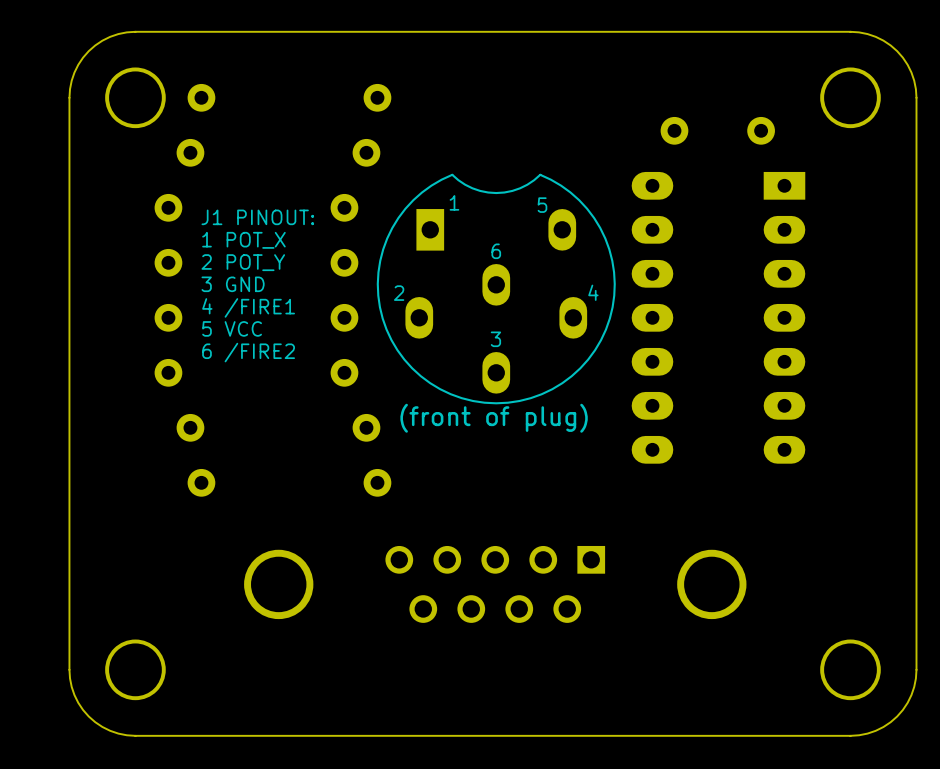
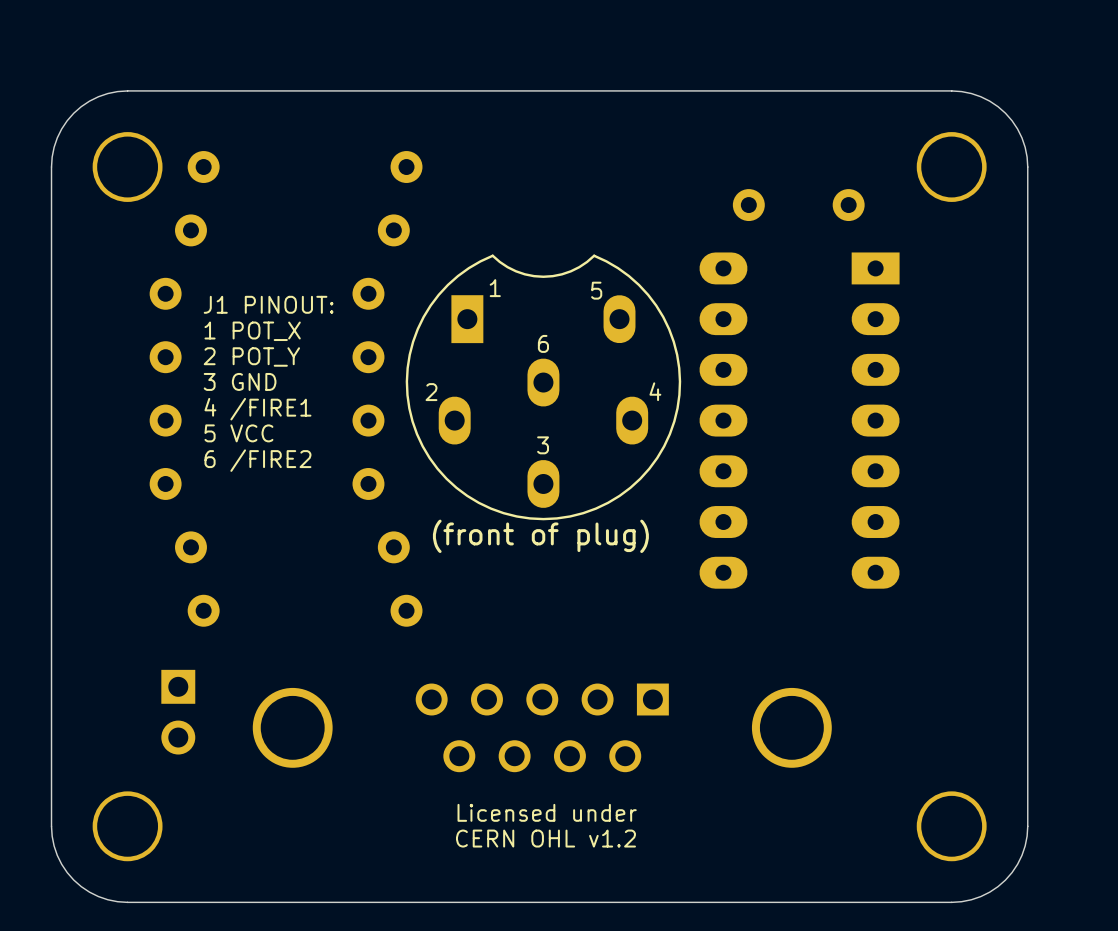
part: none -> (178, 712)
text: none -> Licensed under (547, 812)
text: none -> CERN OHL v1.2 (545, 838)

